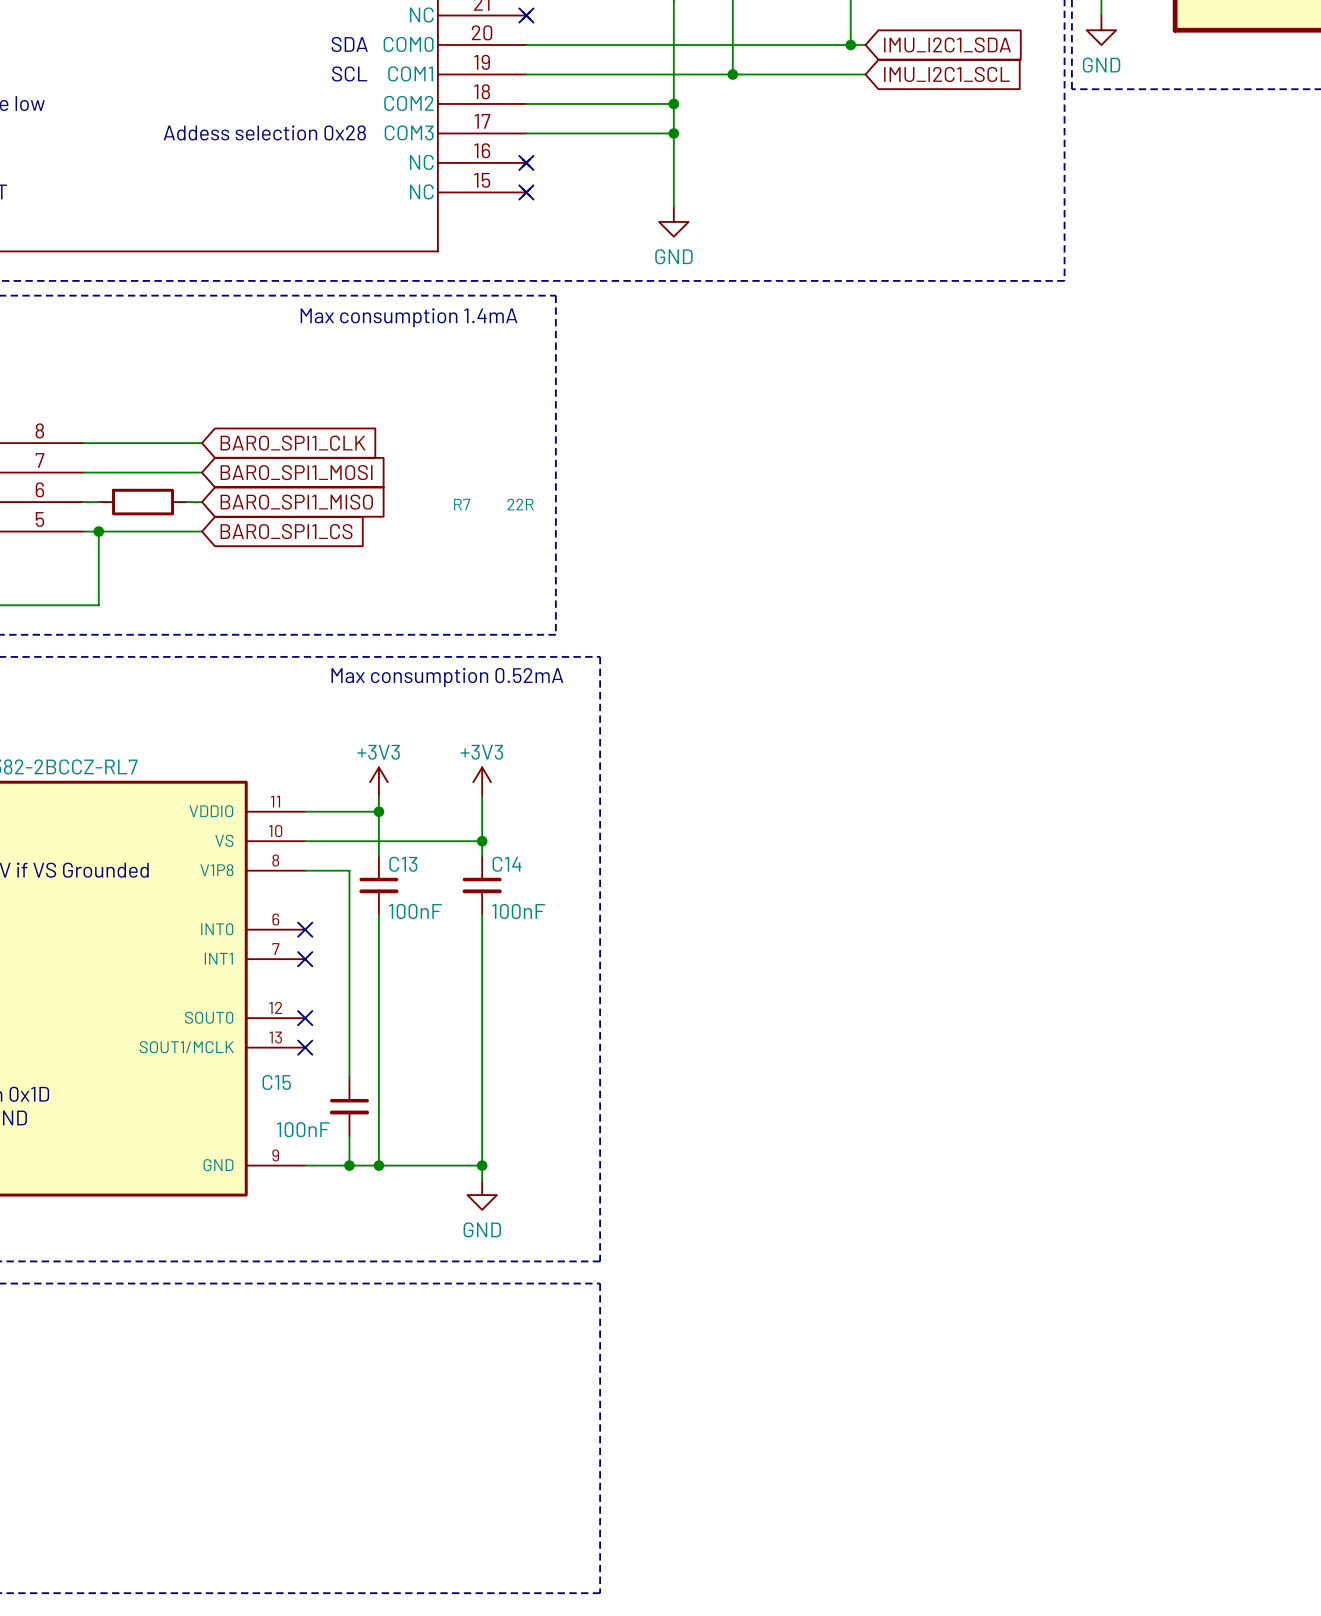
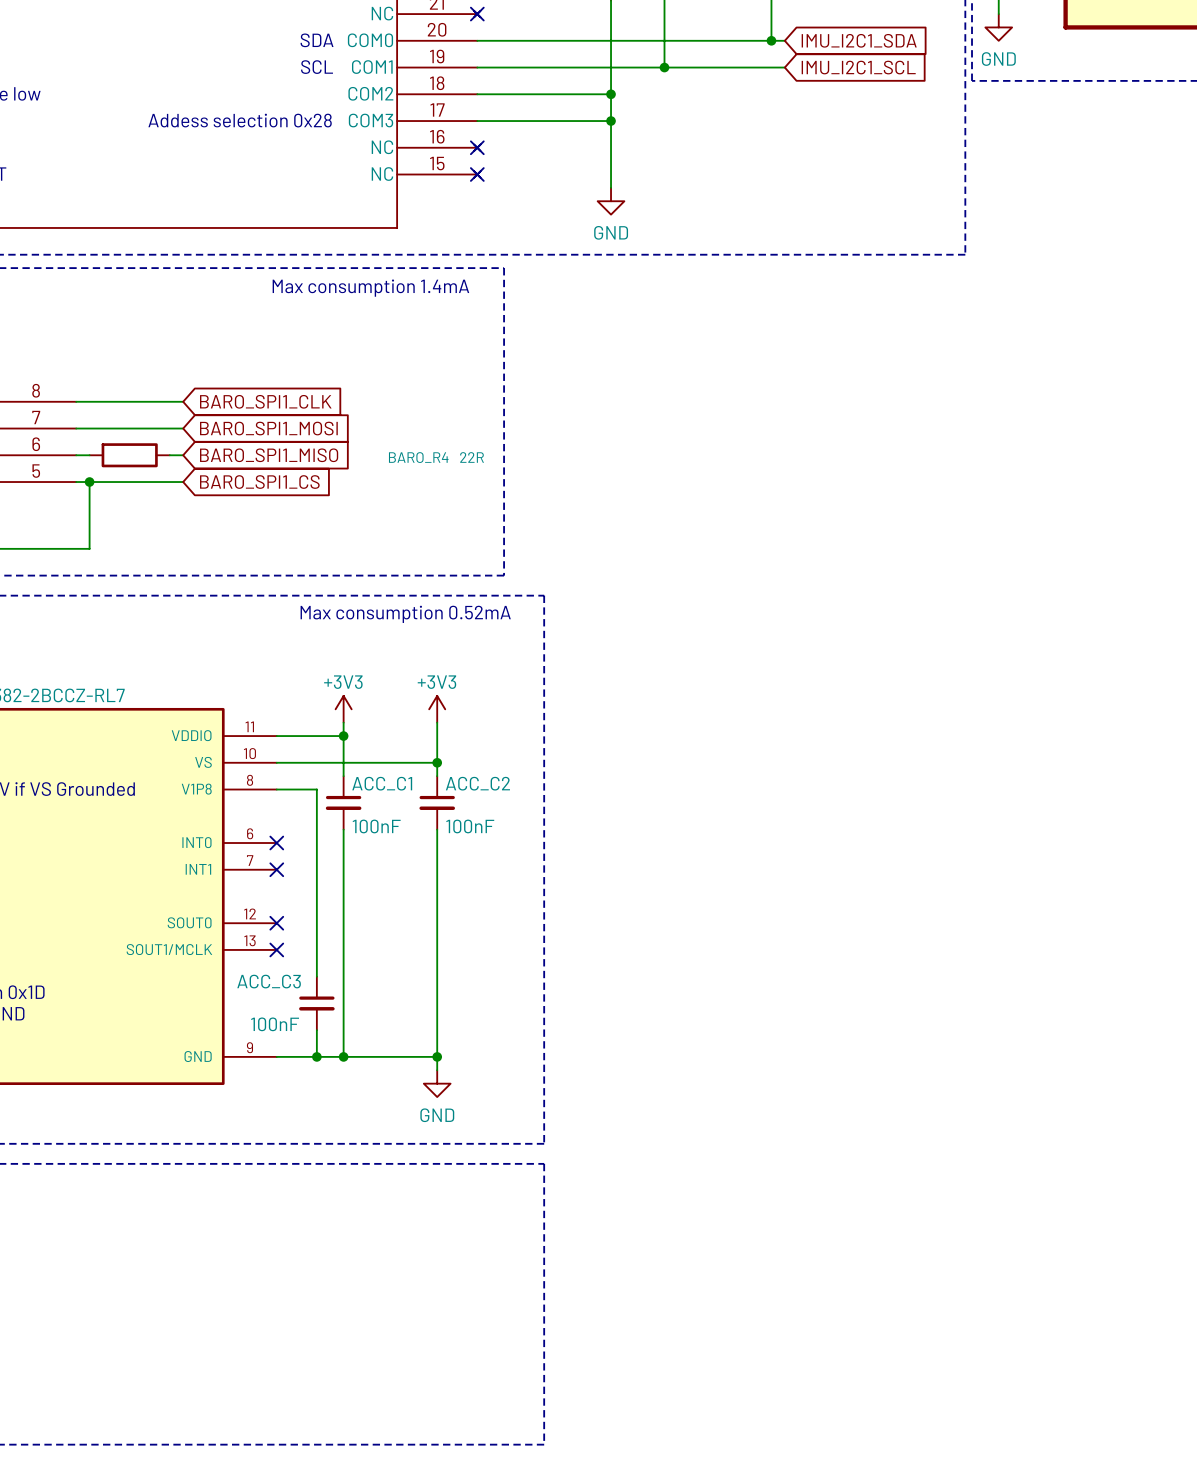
R7 name: R7 (462, 504) -> BARO_R4 (418, 457)
C13 name: C13 (403, 864) -> ACC_C1 (382, 783)
C14 name: C14 (507, 864) -> ACC_C2 (477, 783)
C15 name: C15 (276, 1082) -> ACC_C3 (269, 981)

